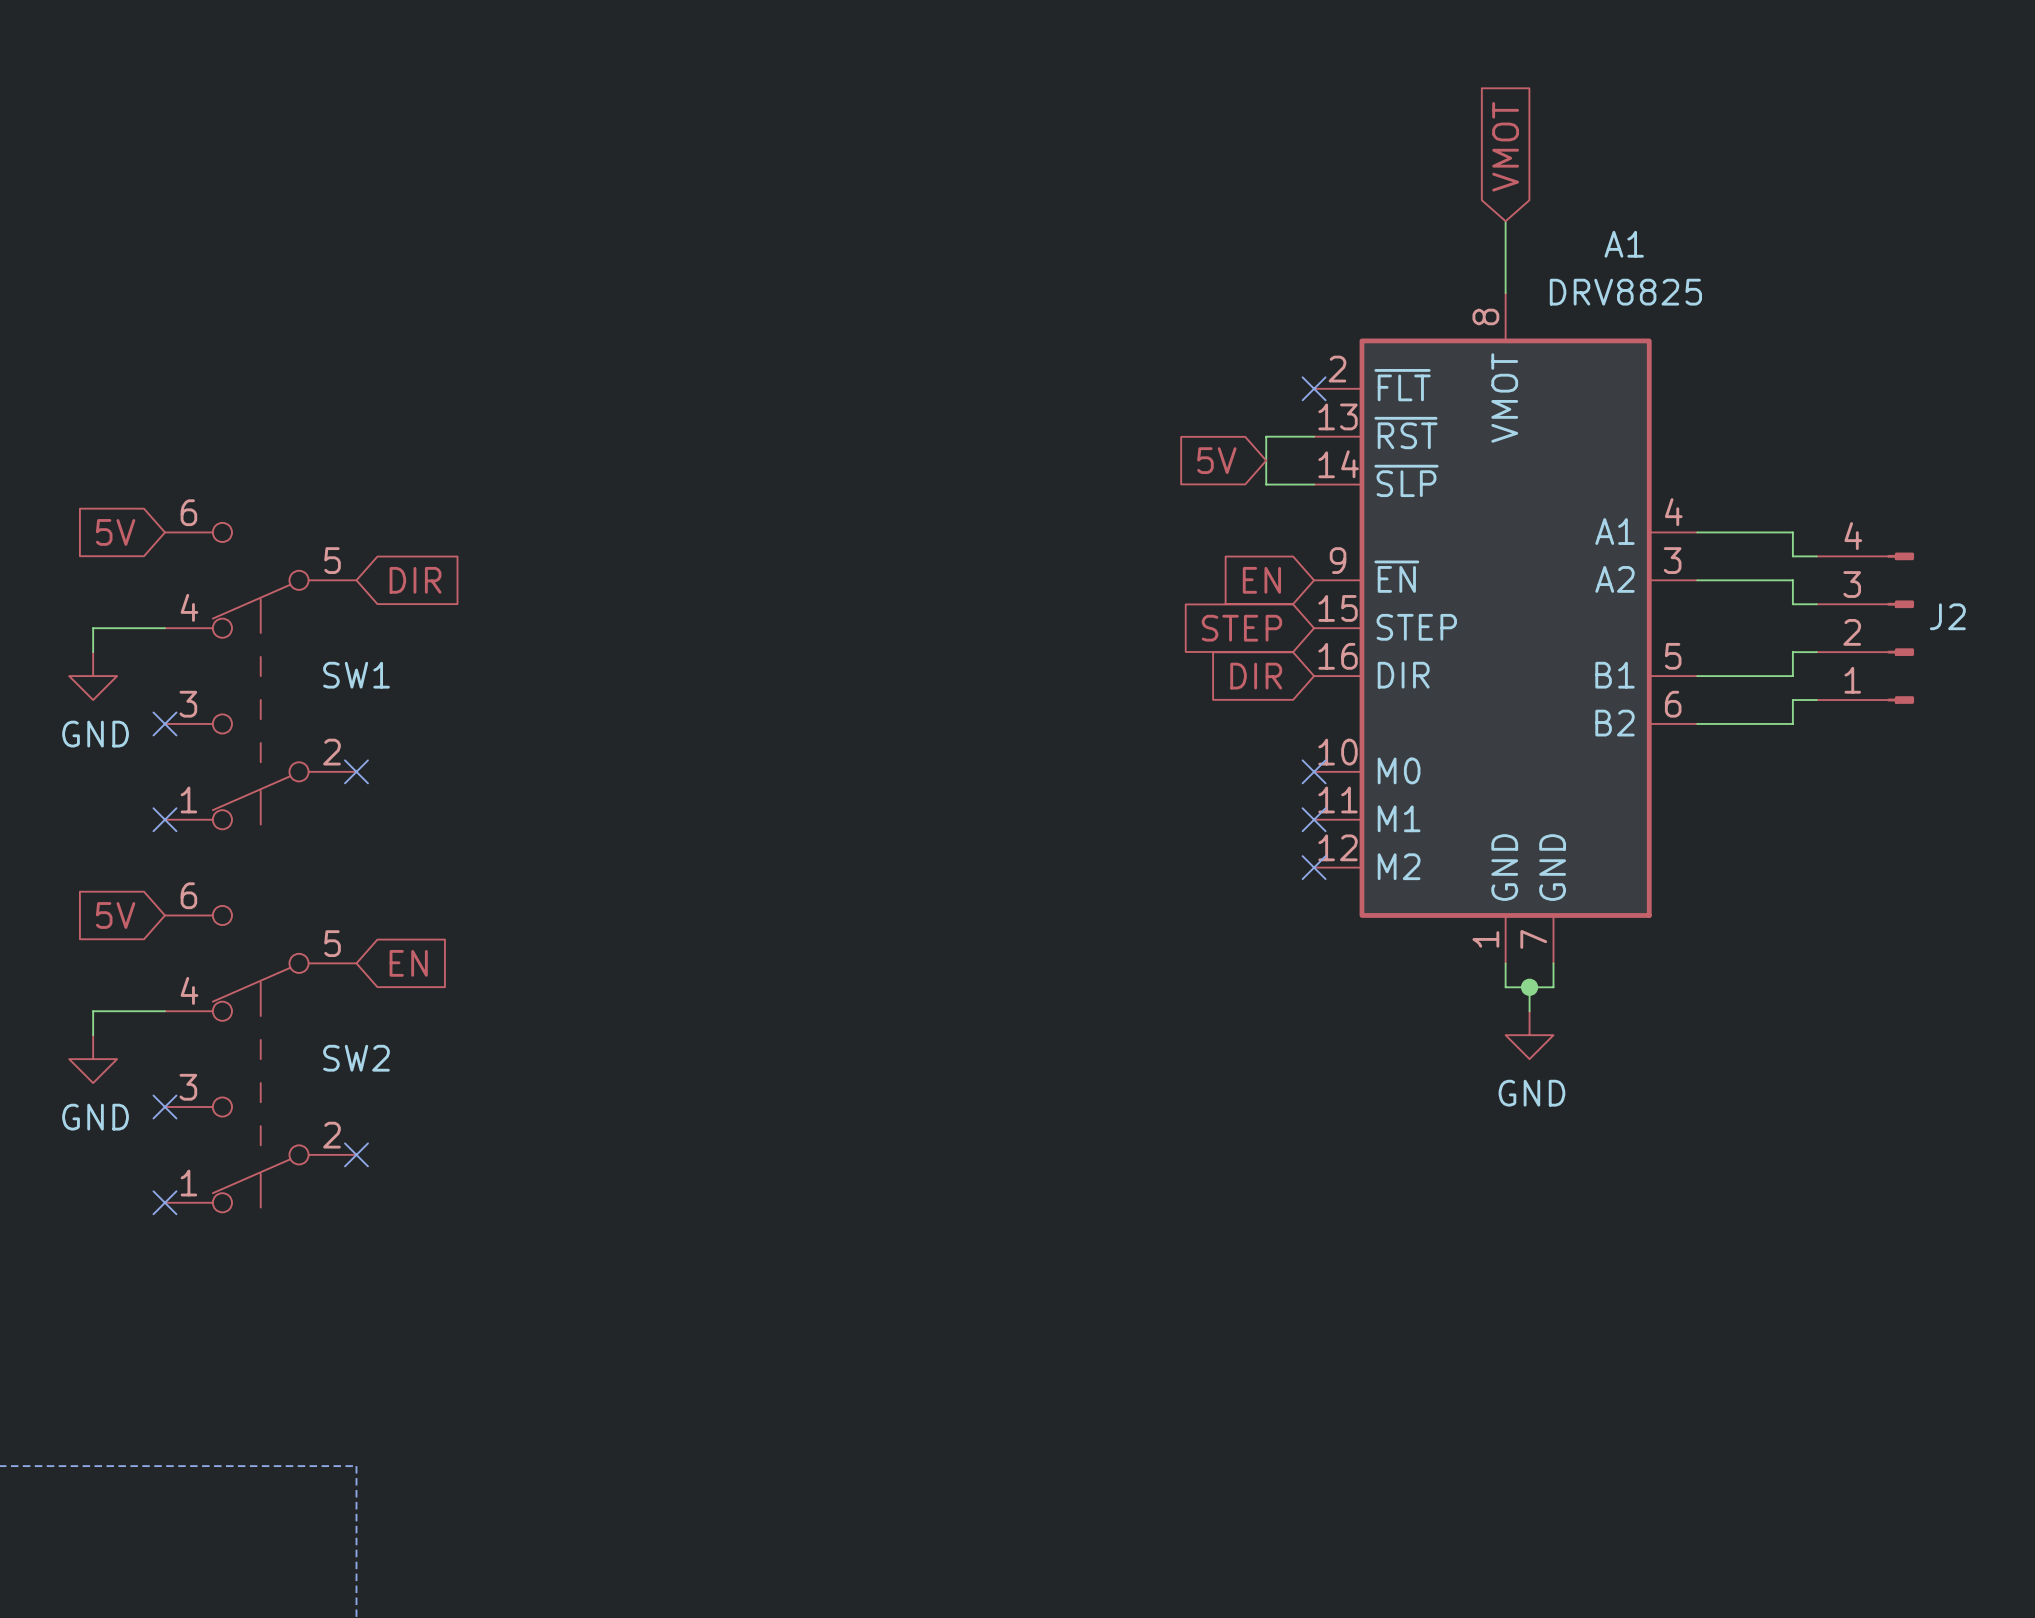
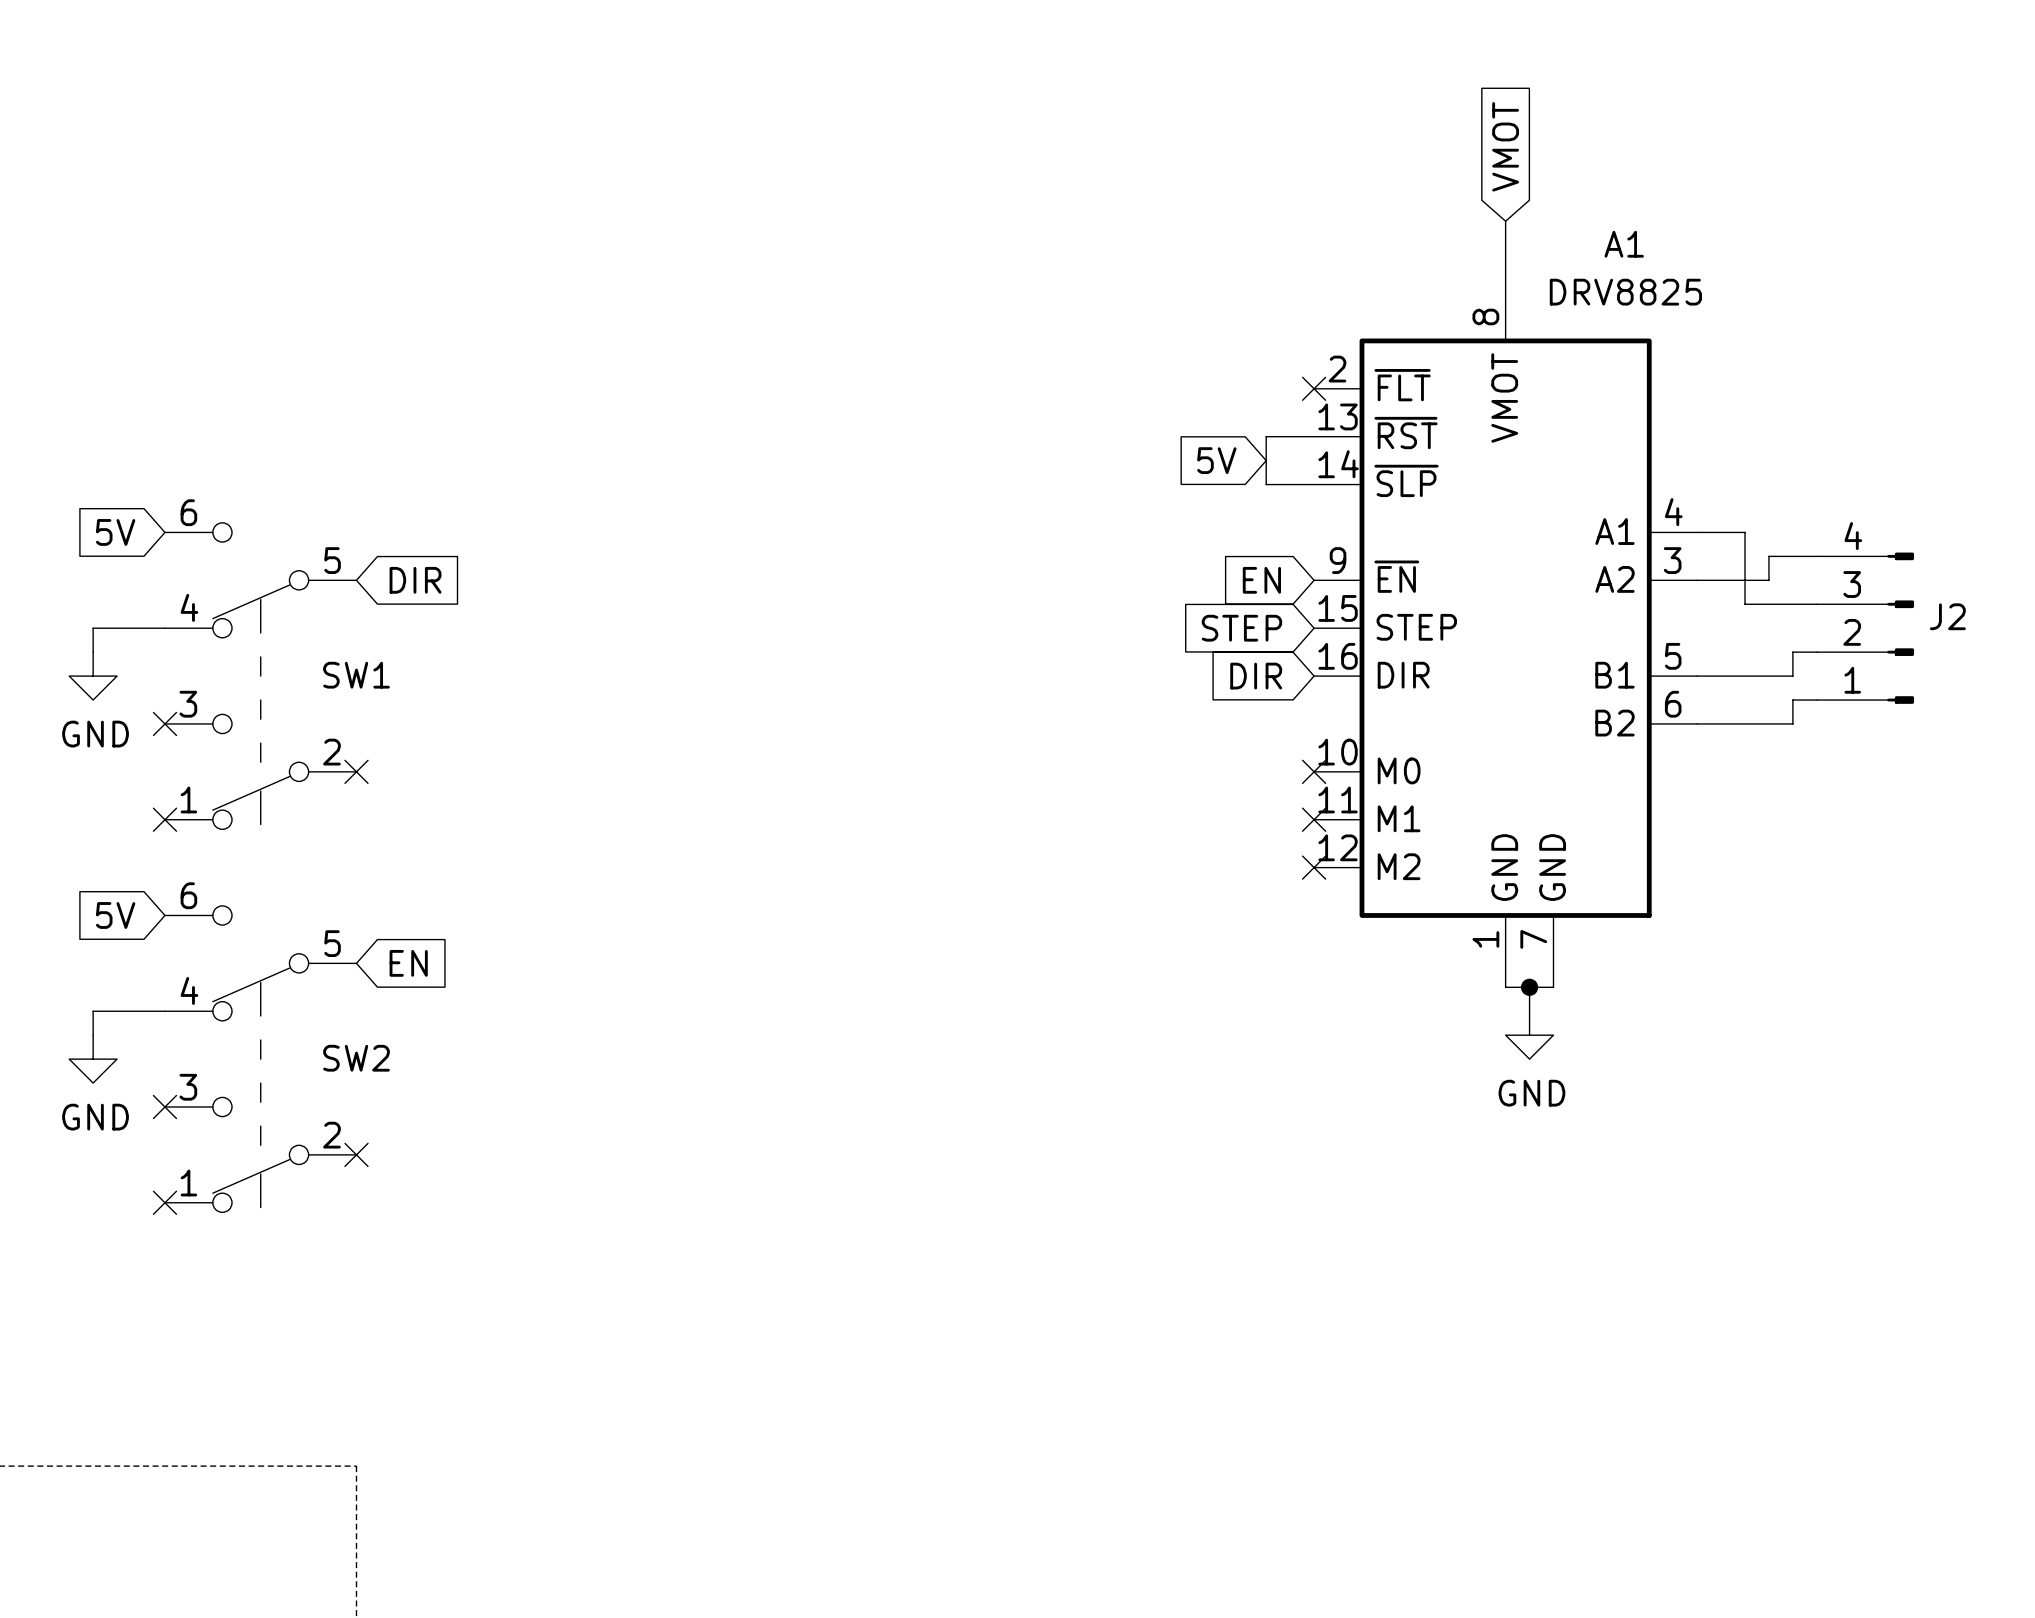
wire: (1745, 532) (1792, 532) (1792, 556) -> (1745, 532) (1745, 604) (1792, 604)
wire: (1768, 580) (1792, 580) (1792, 604) -> (1768, 580) (1768, 556) (1792, 556)

